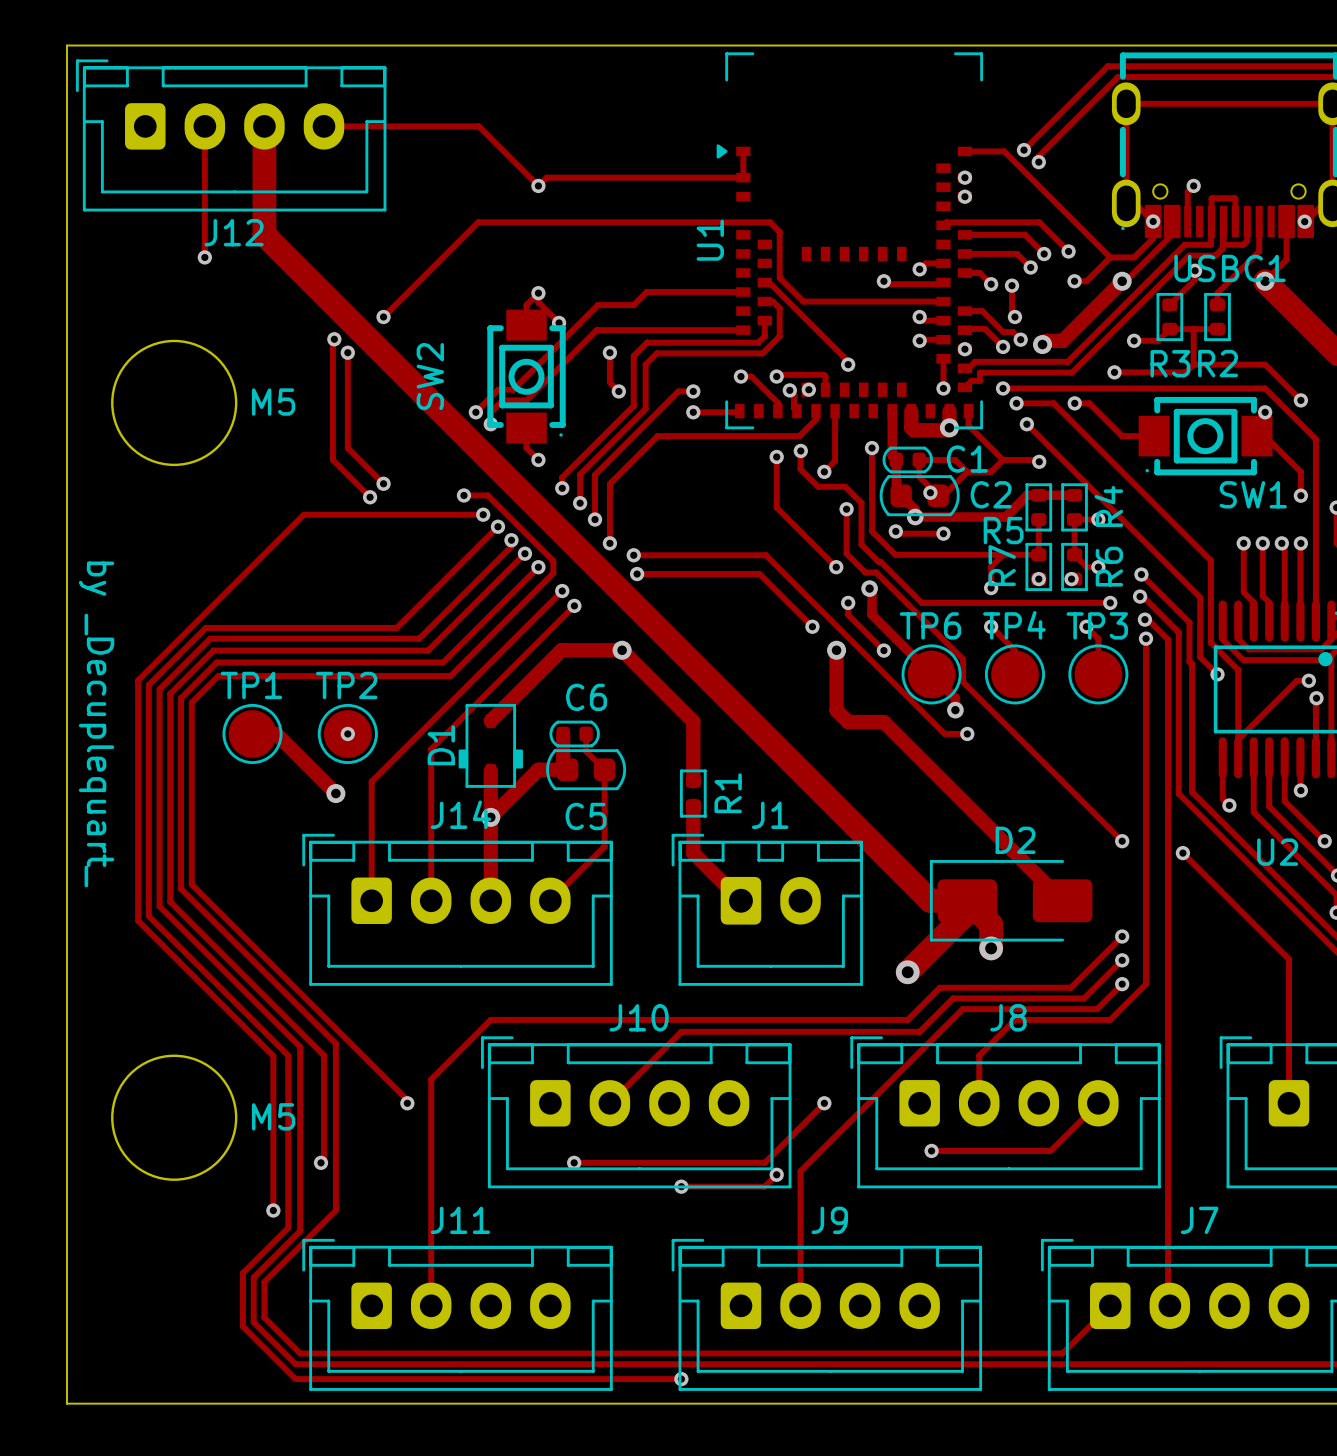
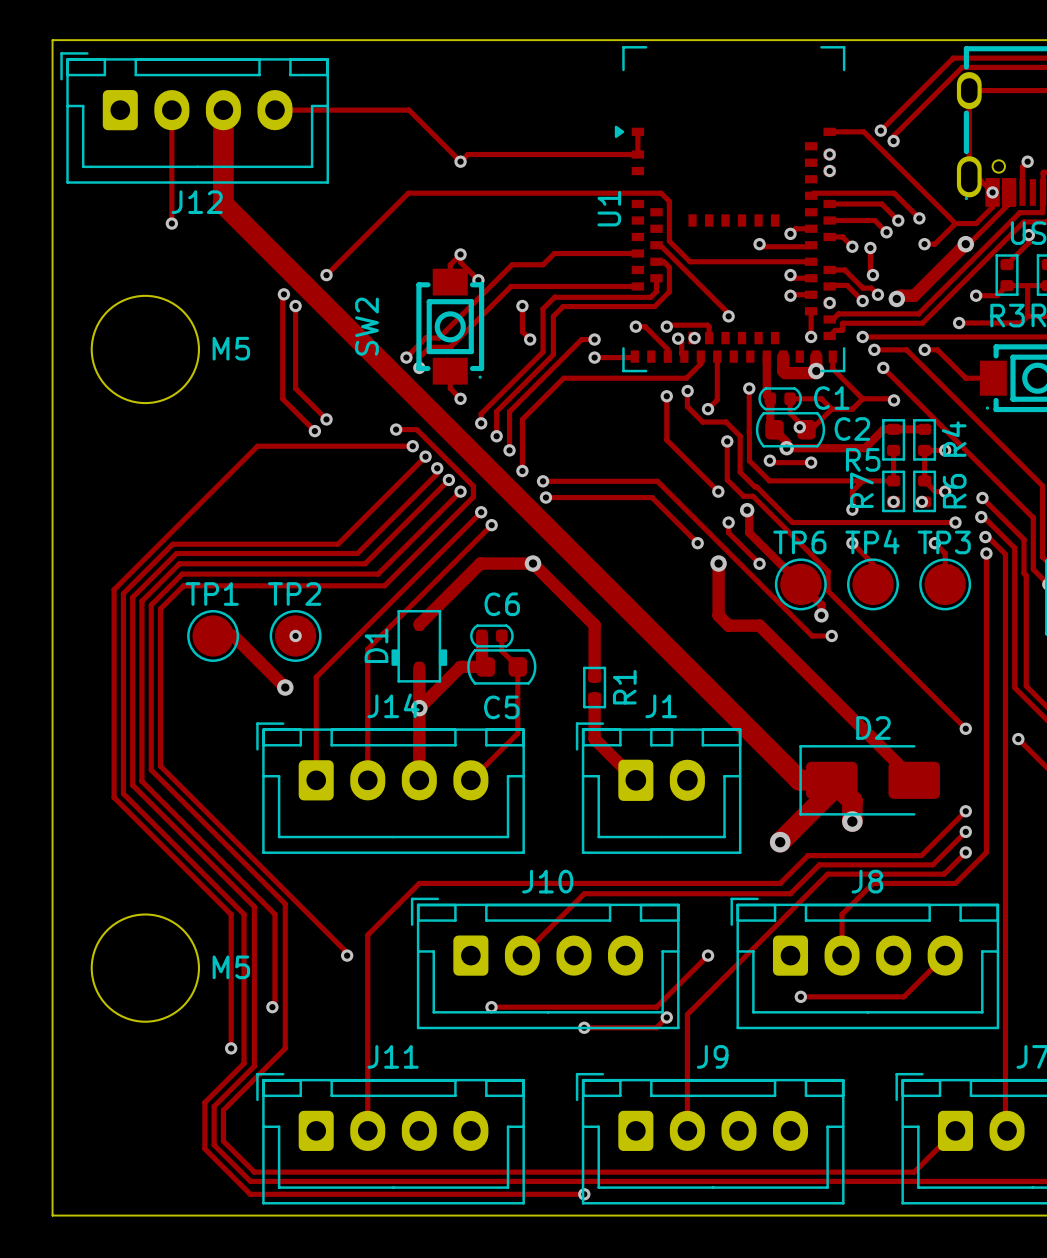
text: by _Decuplequart_ (96, 724) -> none

